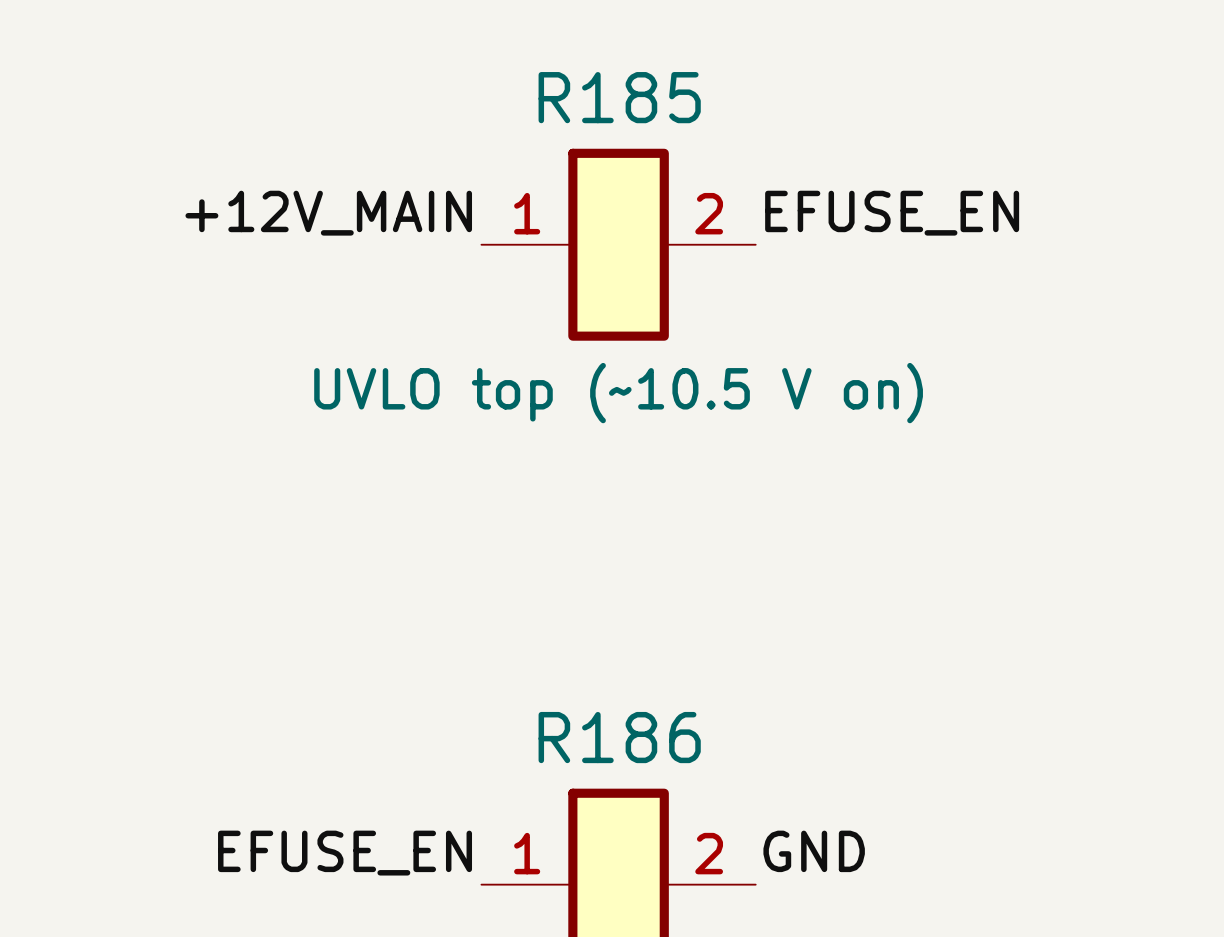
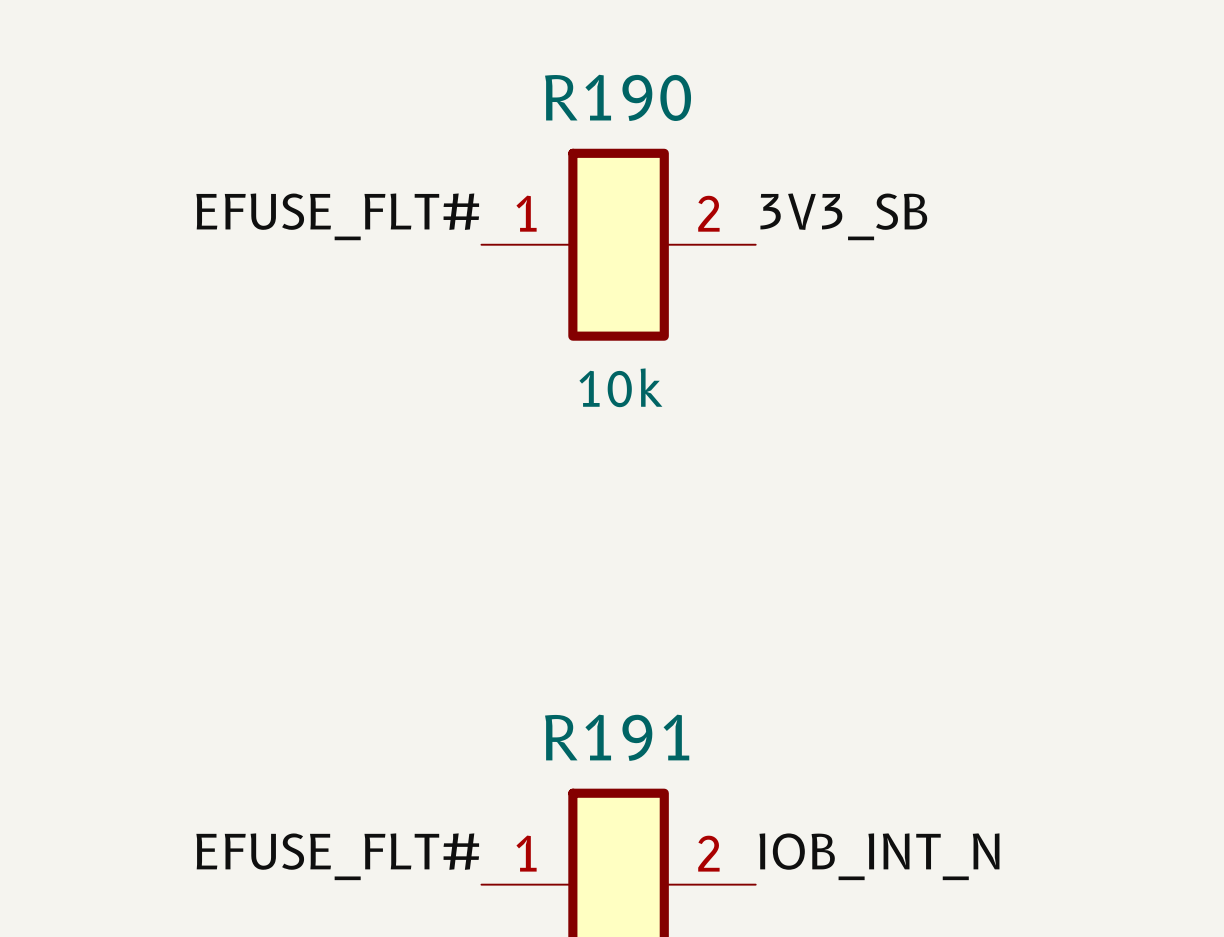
R185 name: R185 (619, 97) -> R190 (618, 97)
label: +12V_MAIN (328, 213) -> EFUSE_FLT# (337, 216)
label: EFUSE_EN (892, 213) -> 3V3_SB (843, 216)
R185 value: UVLO top (~10.5 V on) (618, 393) -> 10k (620, 387)
R186 name: R186 (619, 737) -> R191 (617, 737)
label: GND (814, 851) -> IOB_INT_N (879, 856)
label: EFUSE_EN (345, 853) -> EFUSE_FLT# (337, 856)

